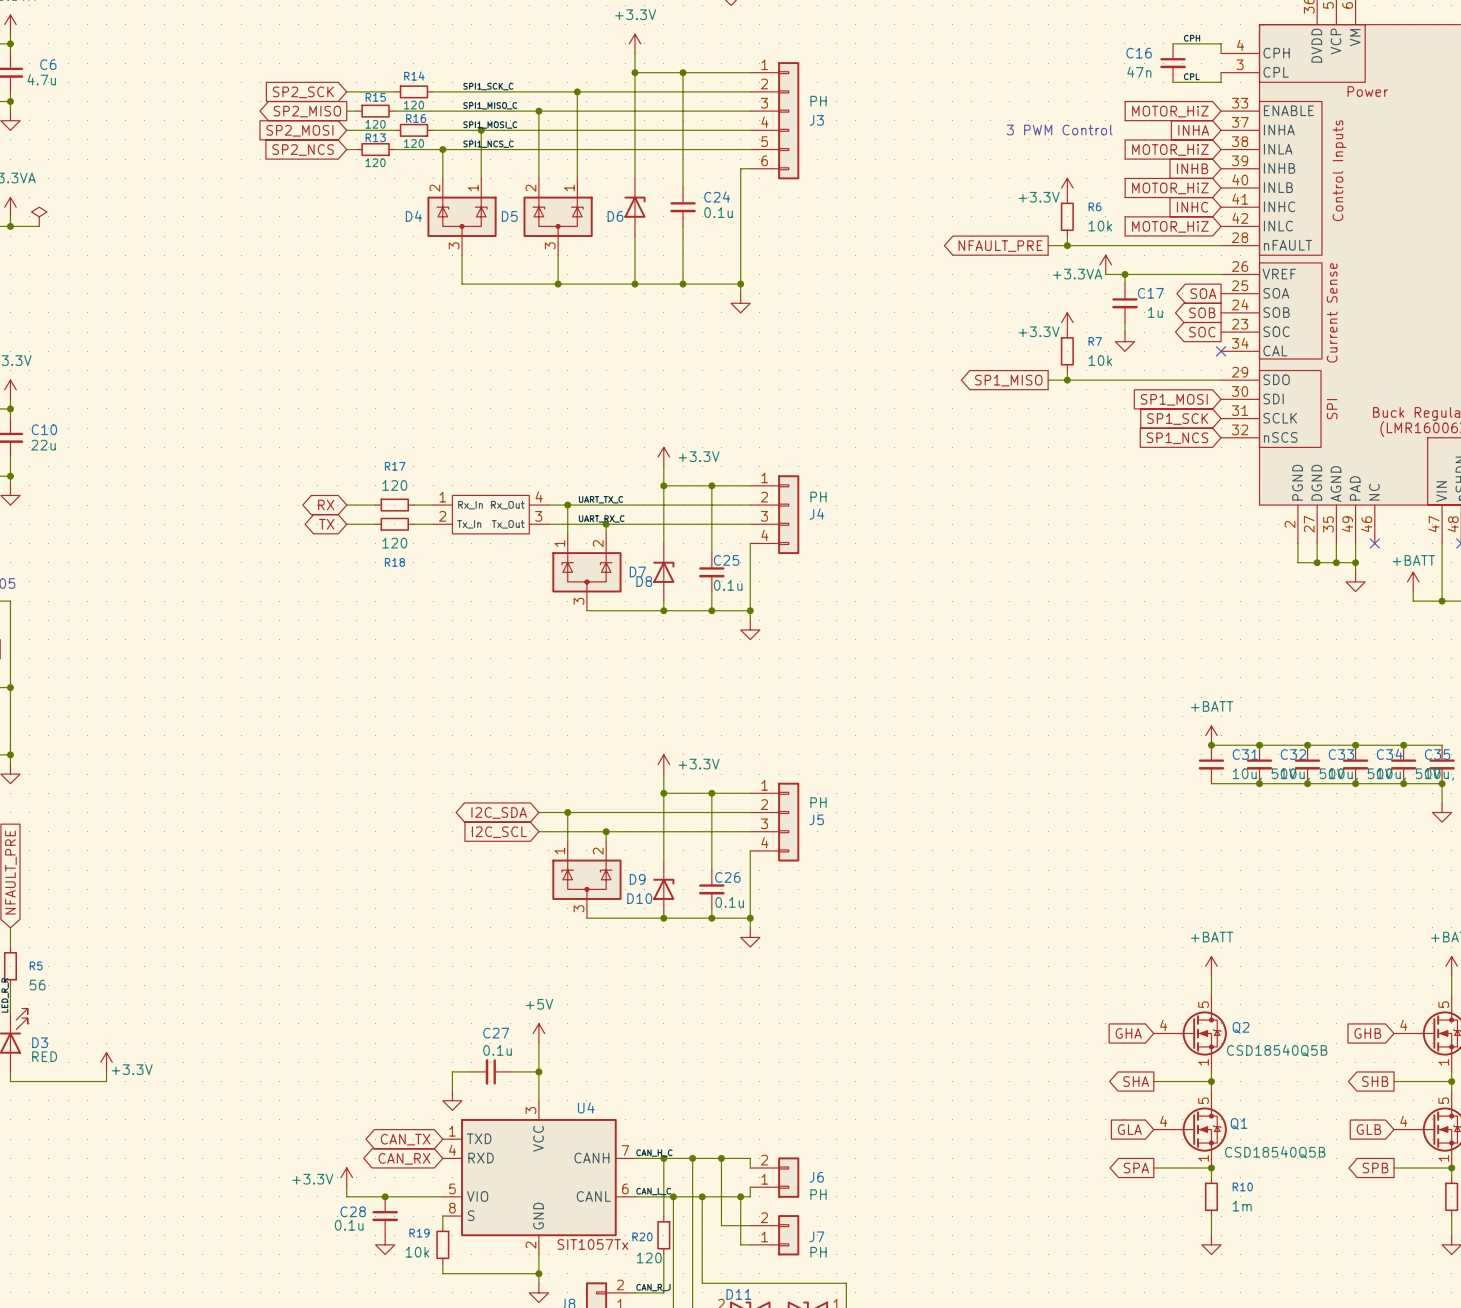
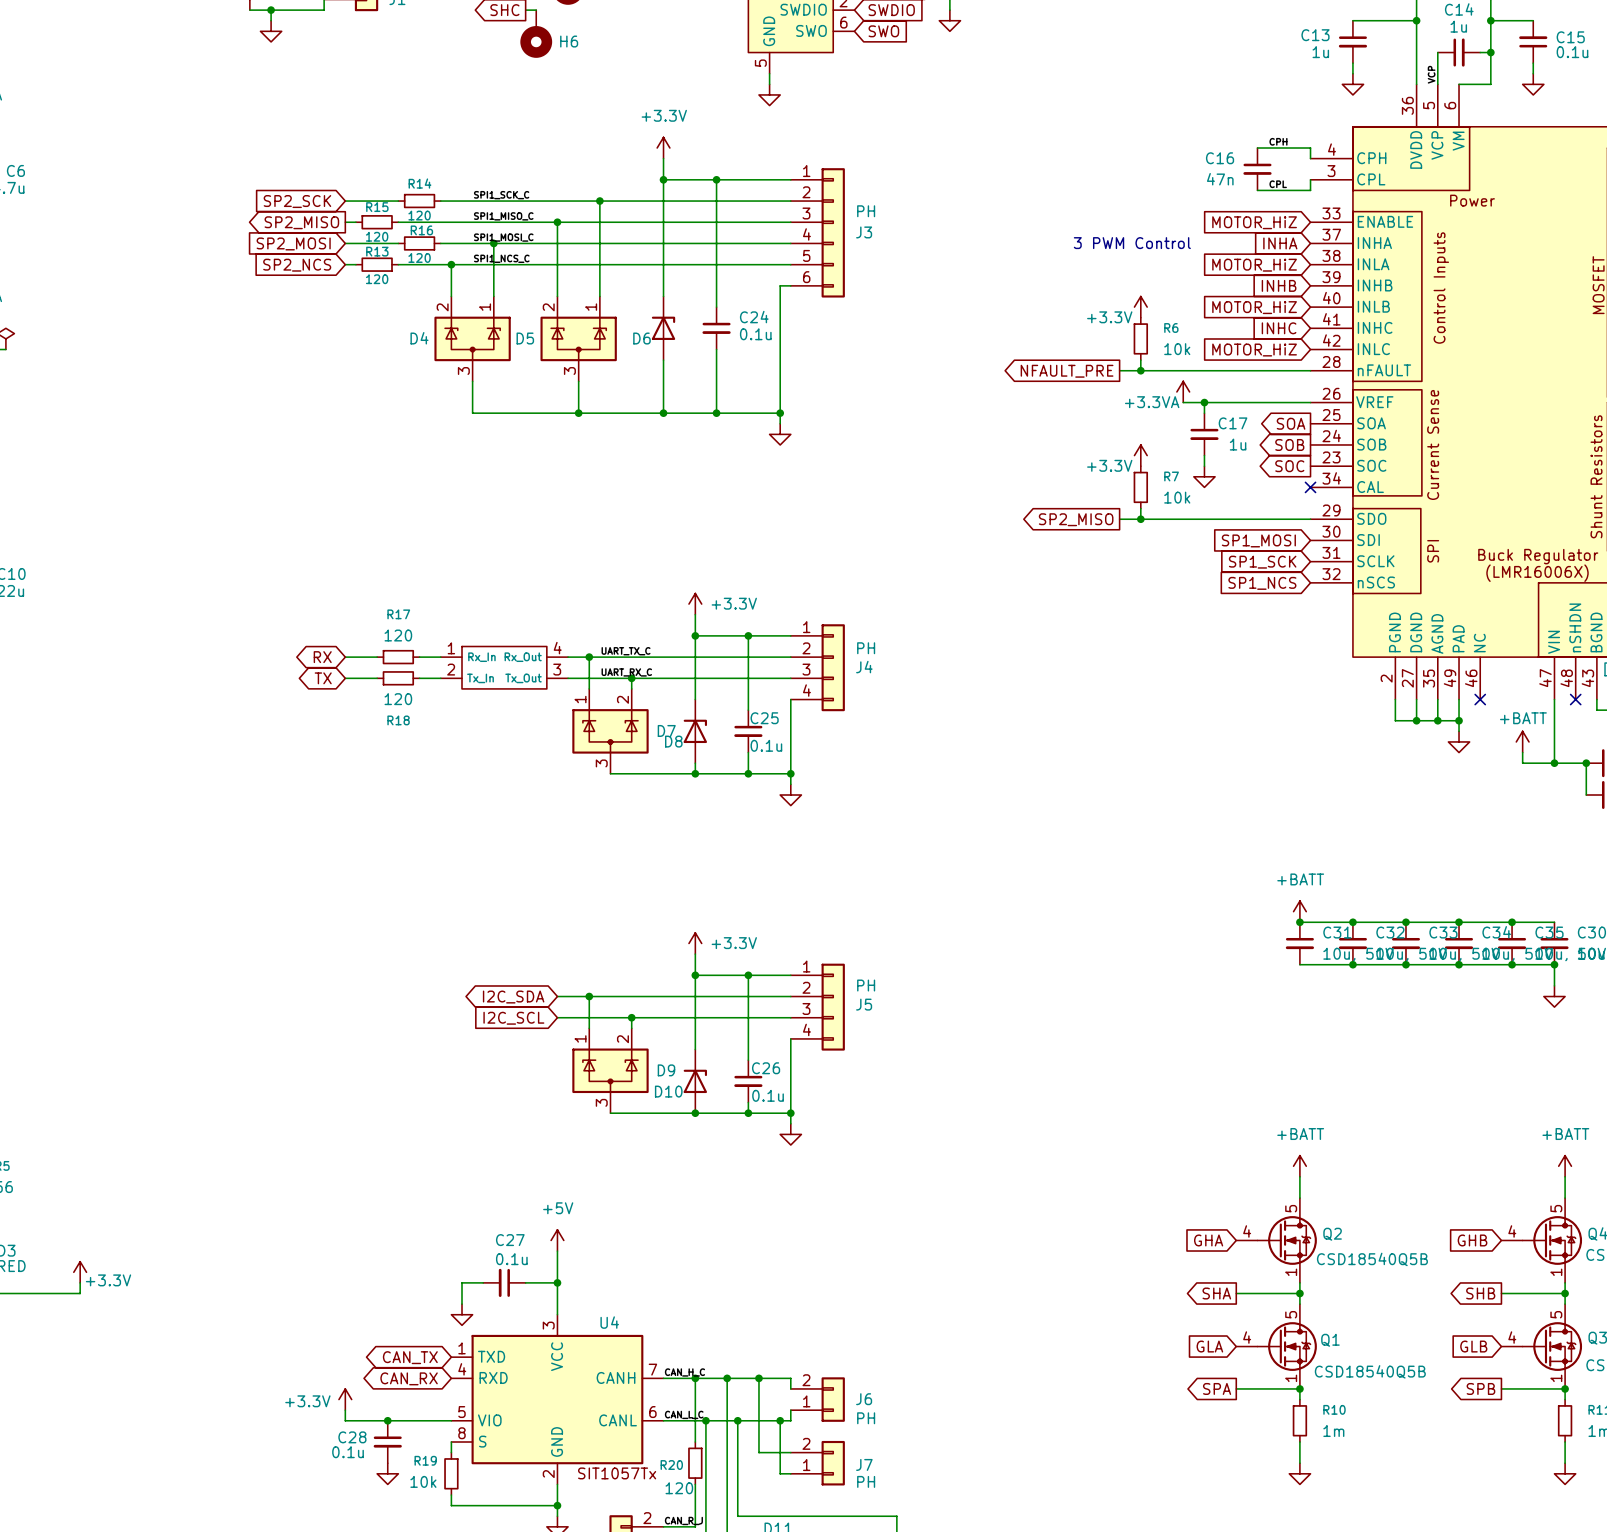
global label: SP1_MISO (1008, 380) -> SP2_MISO (1076, 519)

